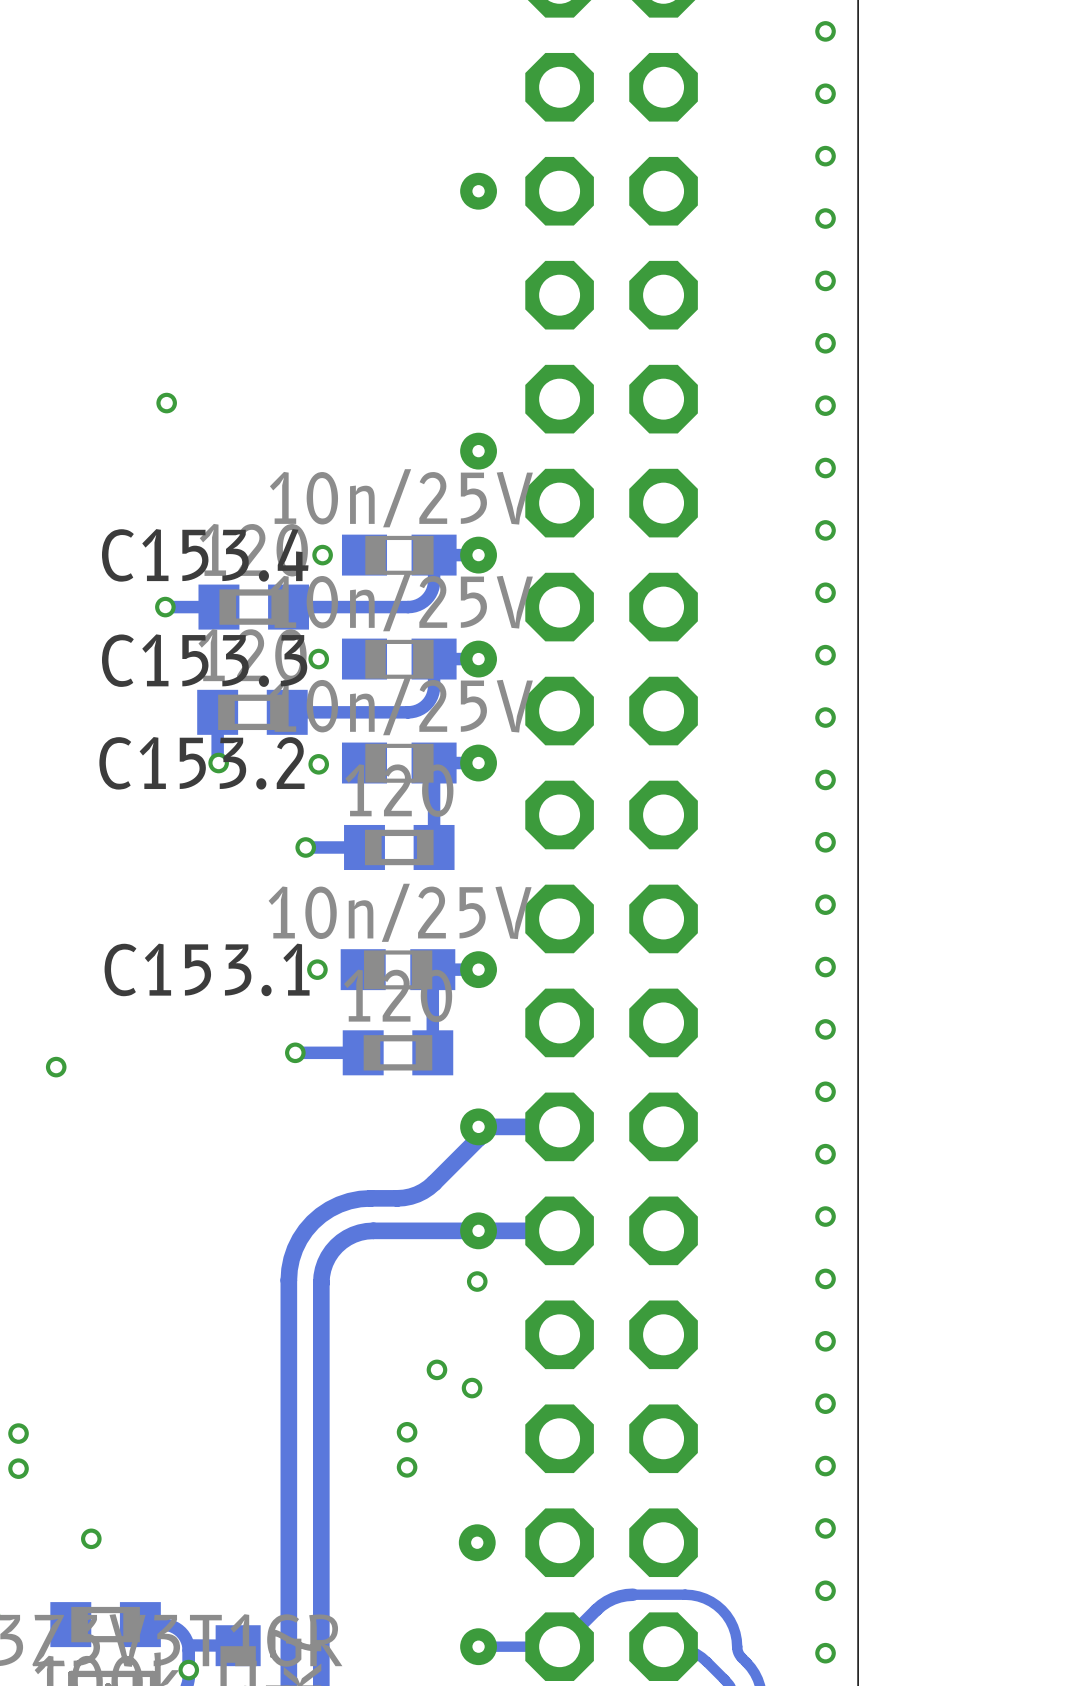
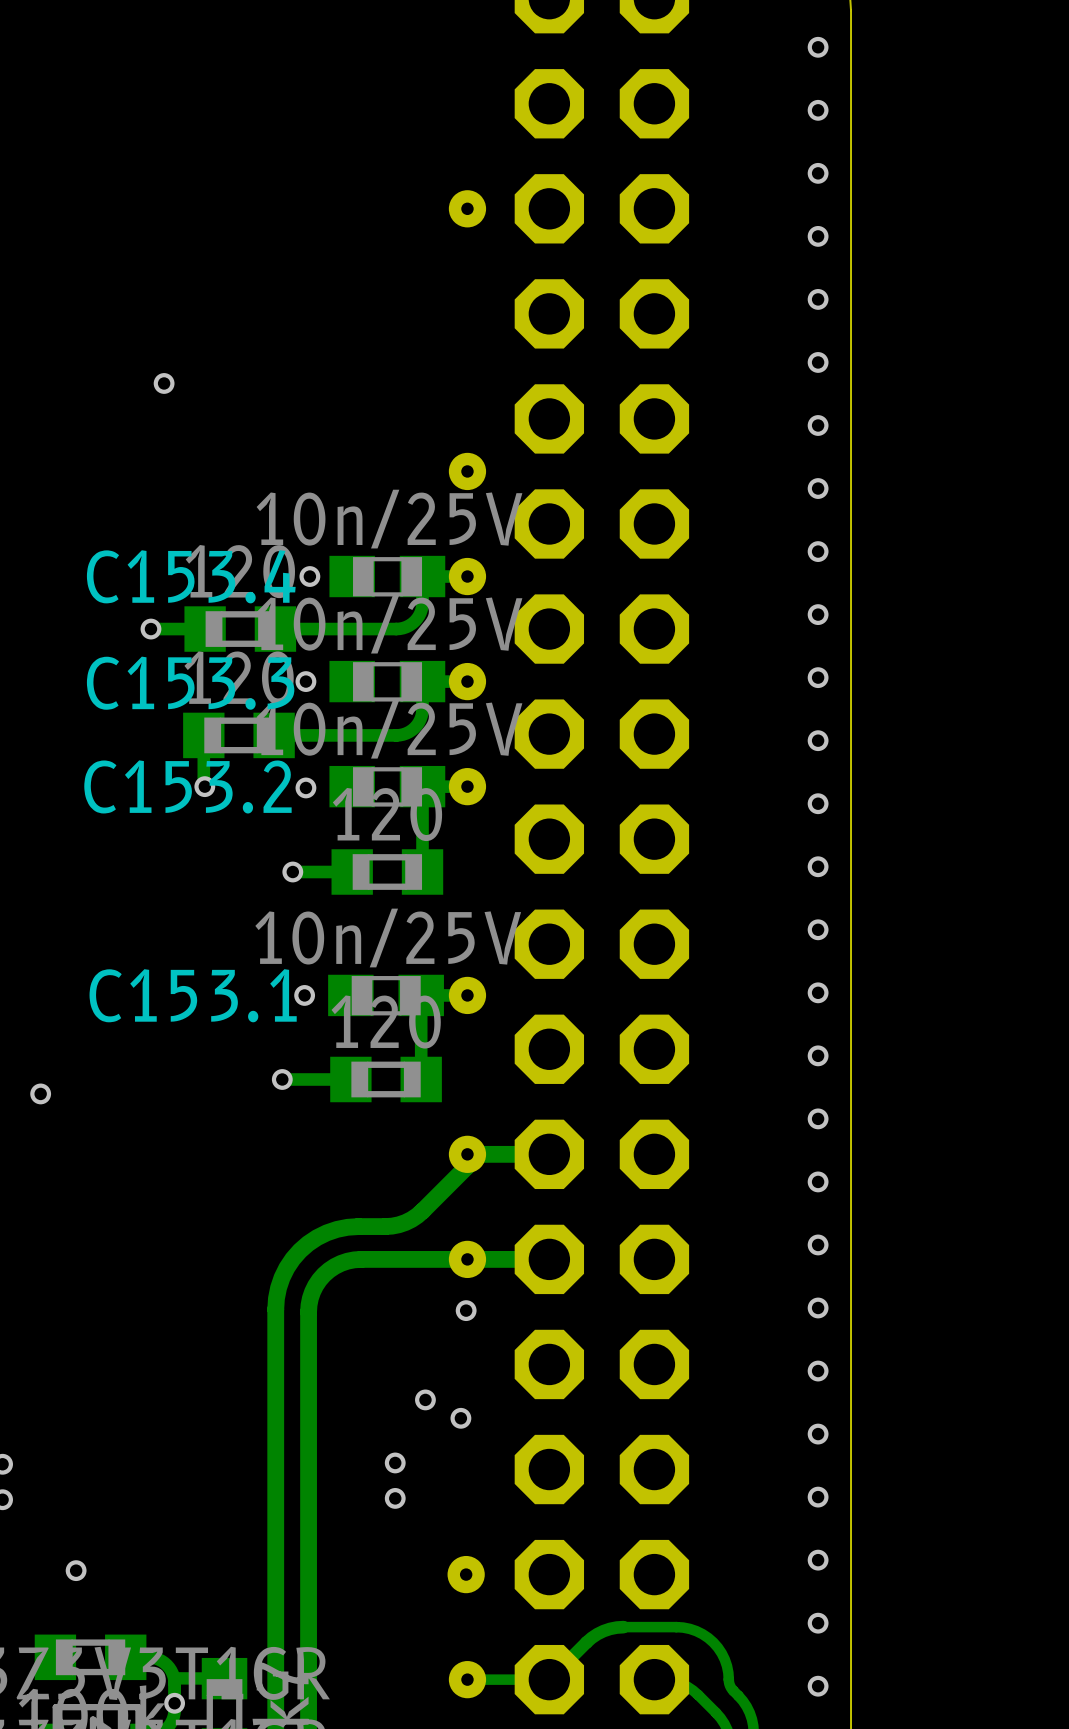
via position: (166, 403) -> (164, 383)

